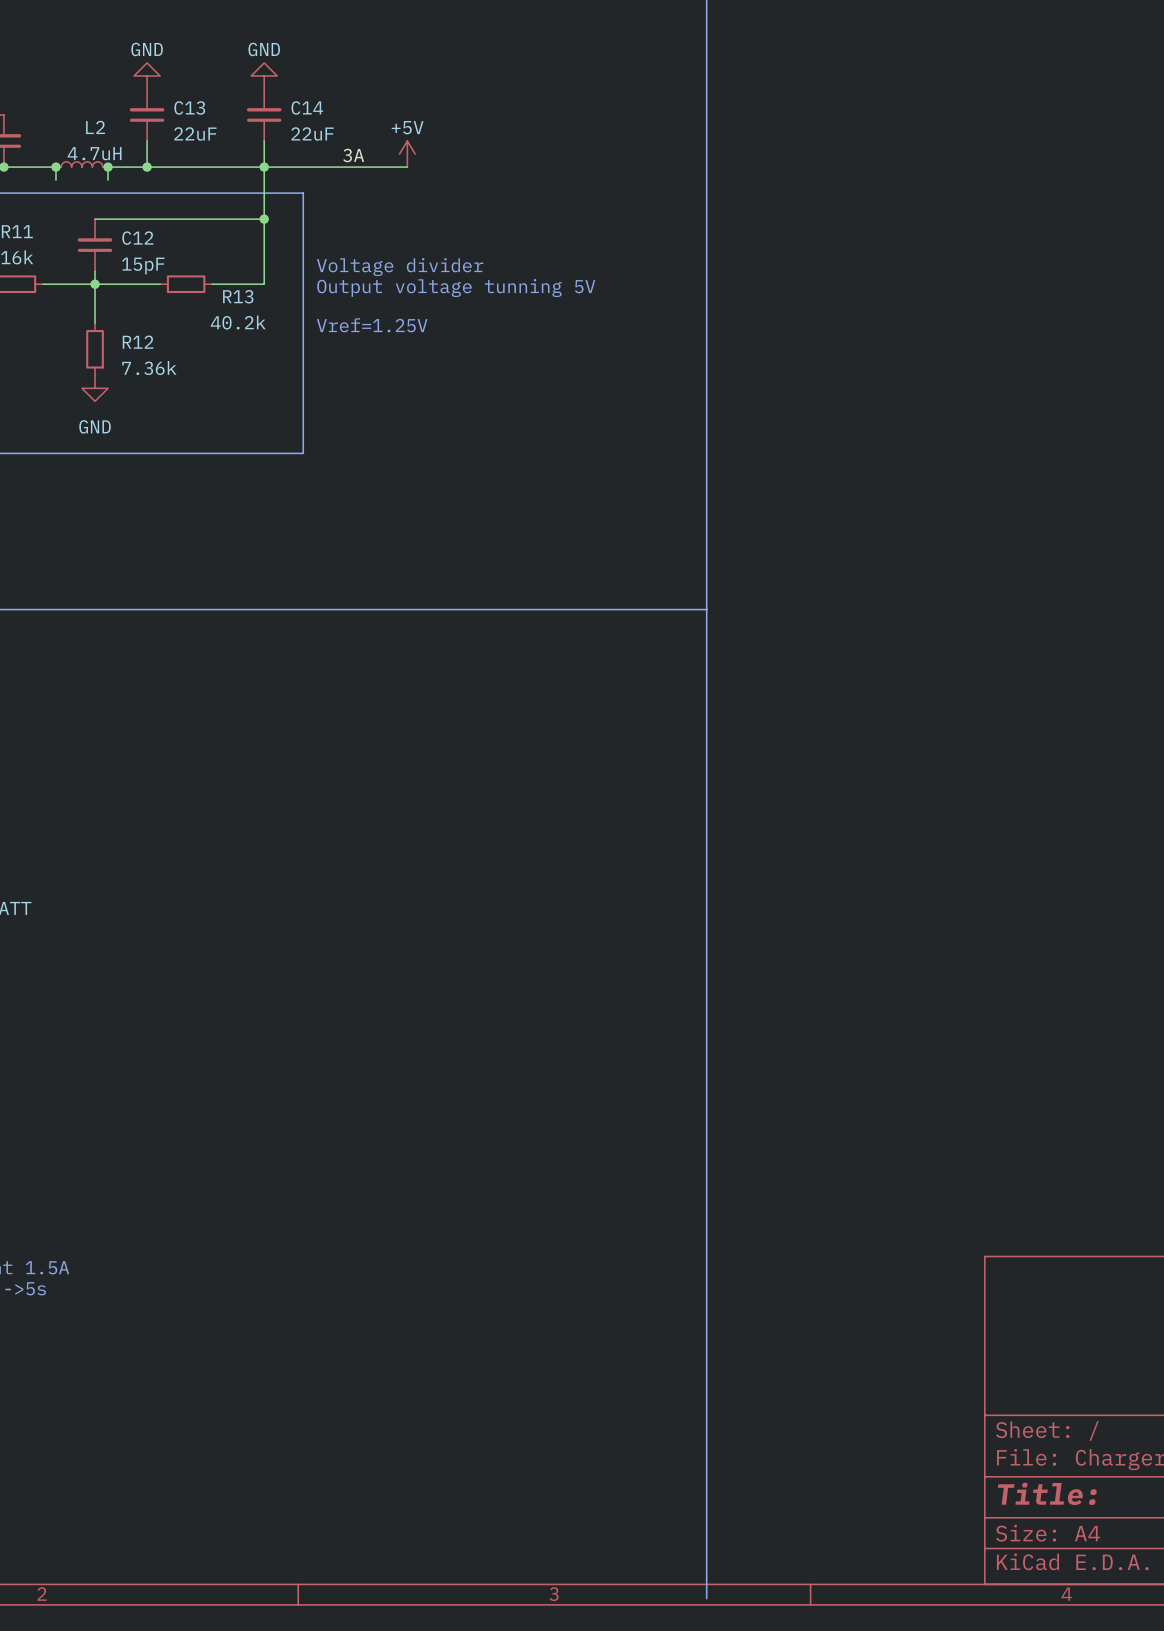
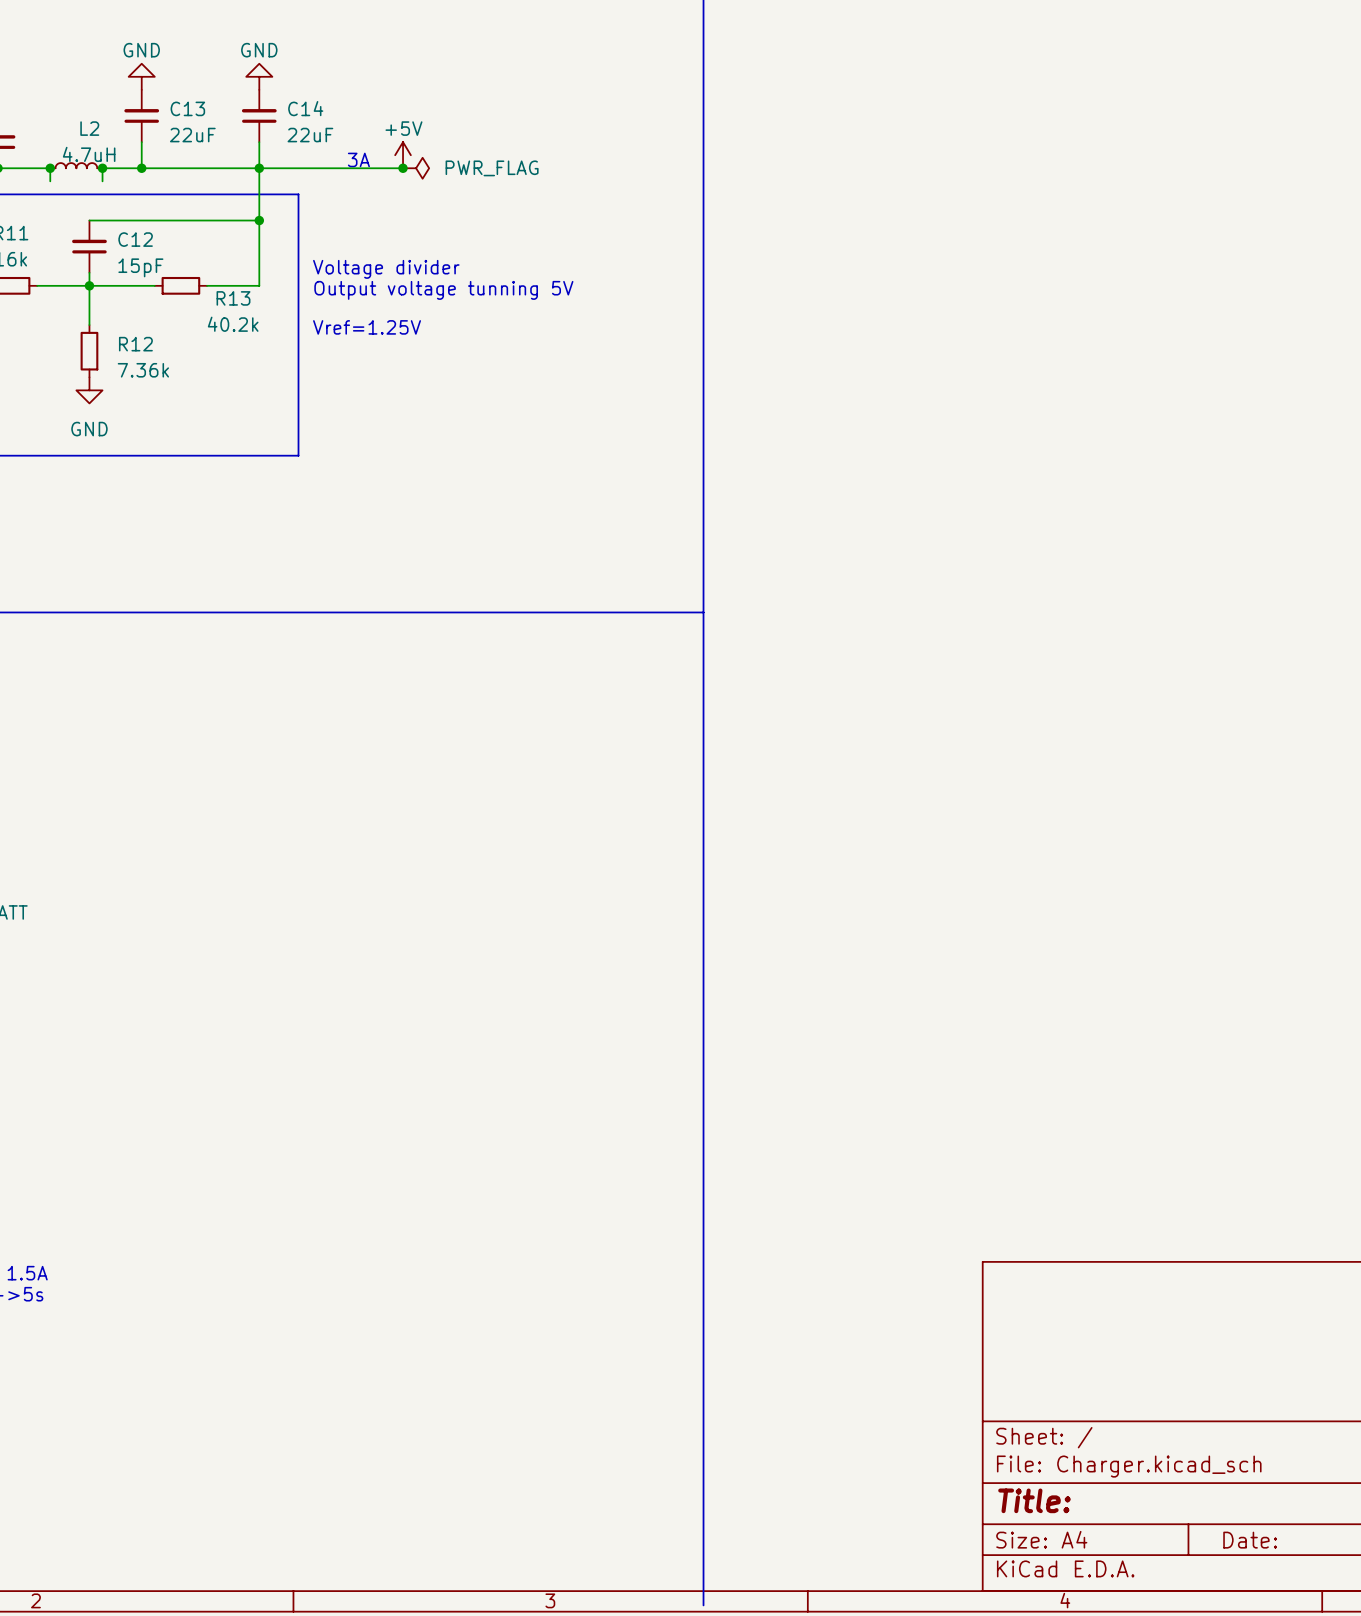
label: 3A (353, 155) -> none
text: none -> 3A (358, 159)
junction: none -> (403, 168)
power symbol: none -> PWR_FLAG (416, 168)

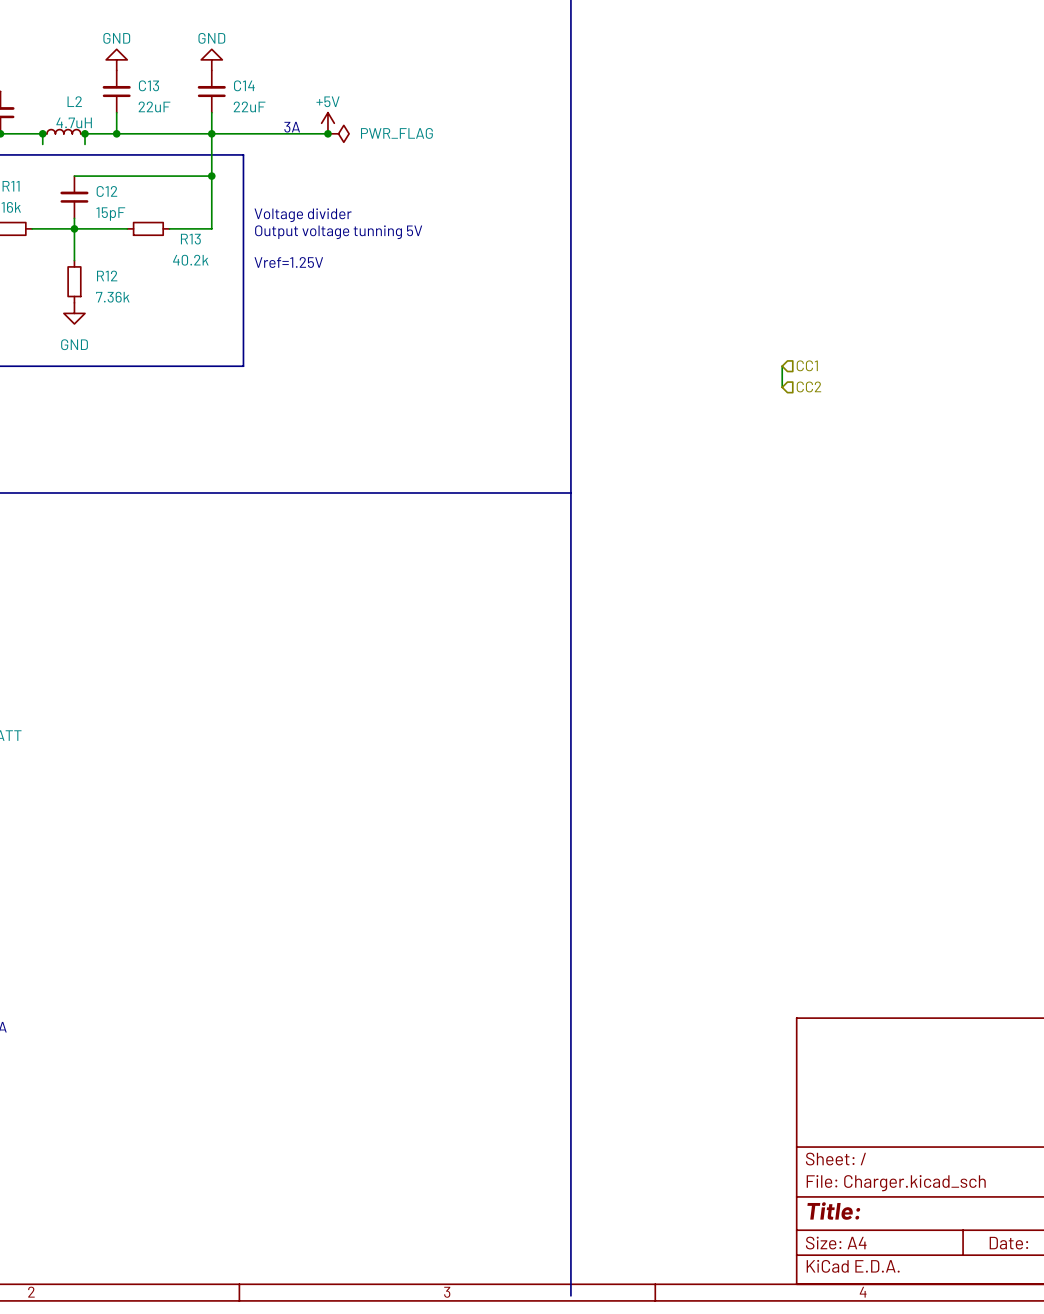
wire: none -> (782, 366) (782, 387)
hierarchical label: none -> CC1 (807, 365)
hierarchical label: none -> CC2 (808, 386)

